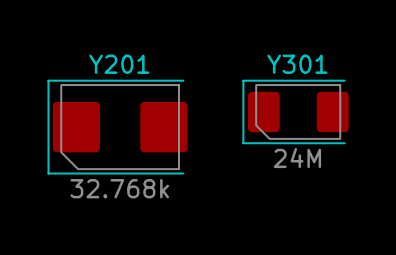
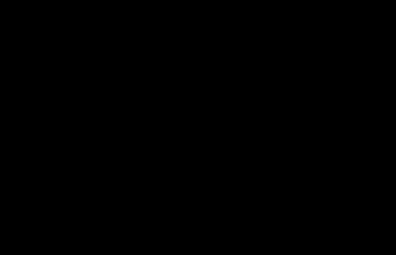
Y301: 24M (295, 111) -> none
Y201: 32.768k (117, 127) -> none

